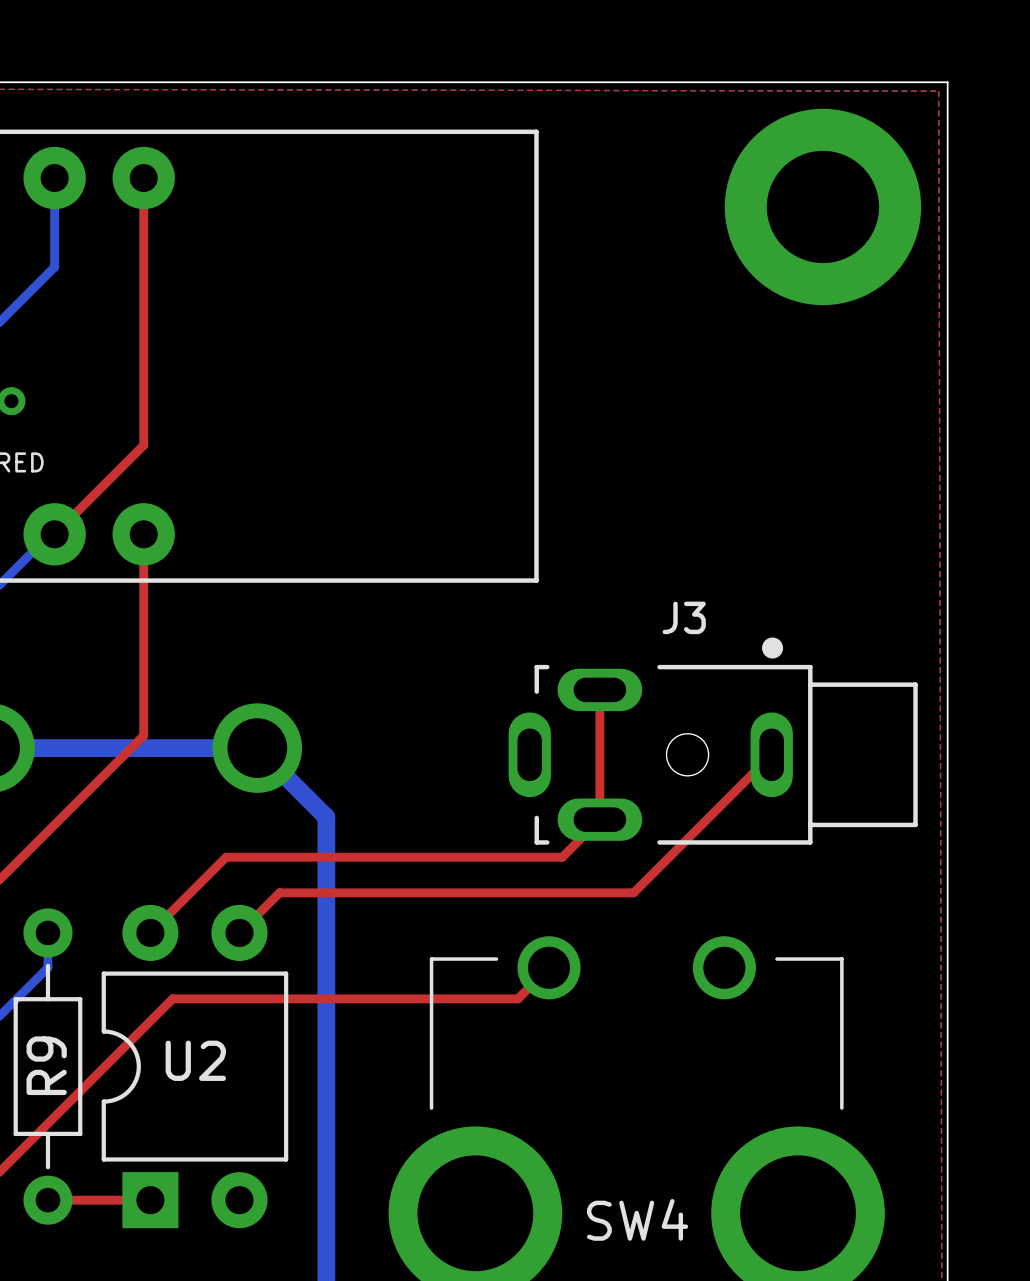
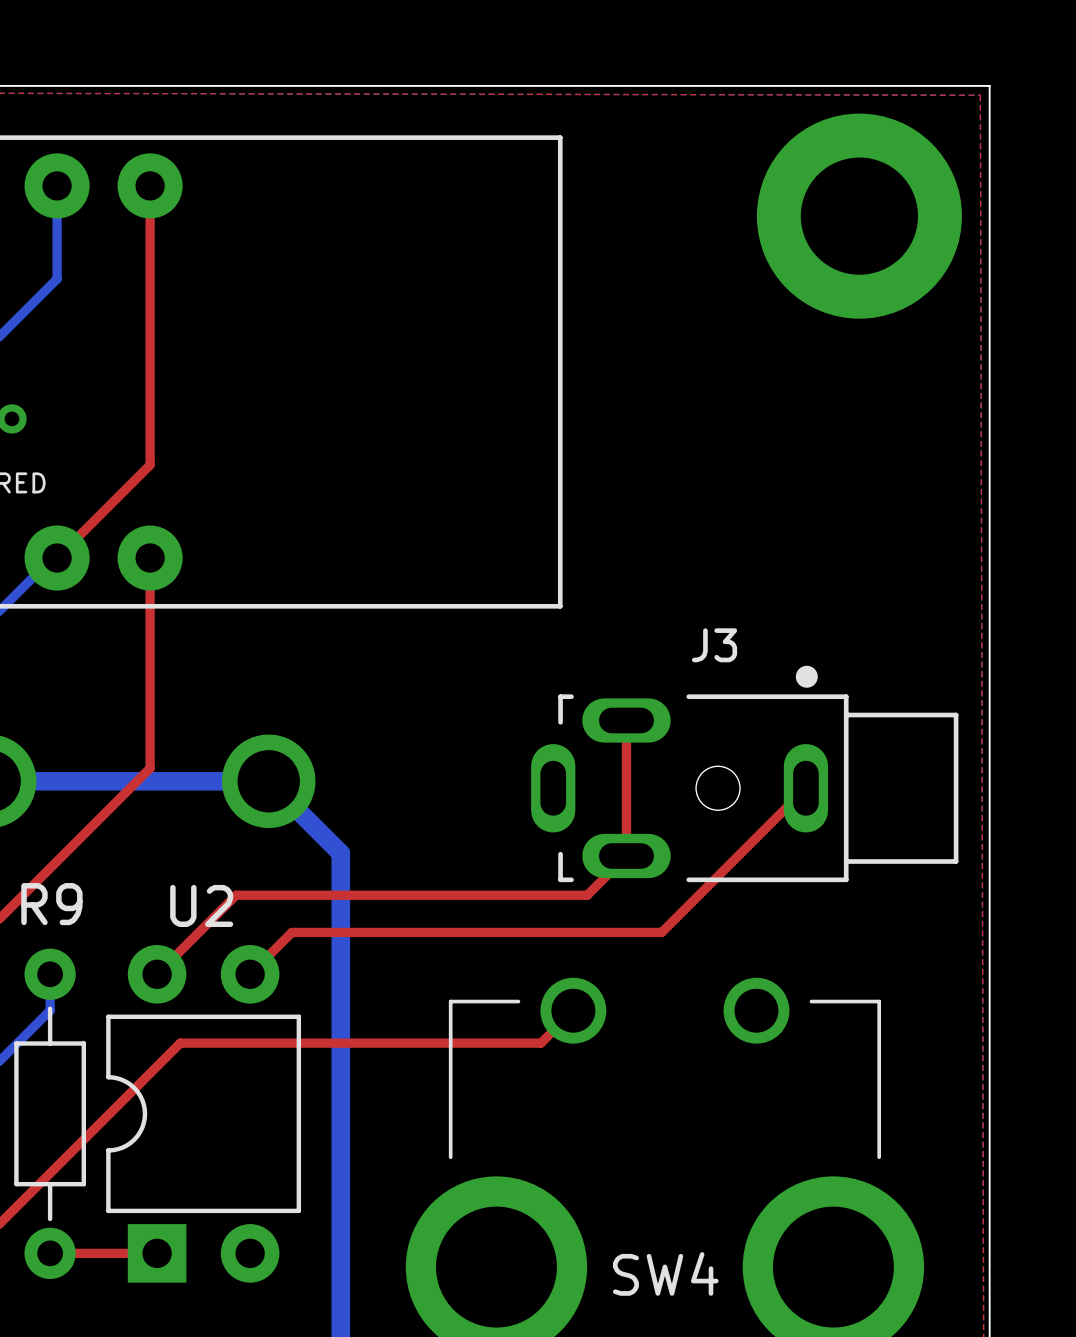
U2 name position: U2 (195, 1060) -> U2 (201, 905)
R9 name rotation: 0° (46, 1065) -> 90° clockwise (51, 904)
R9 name position: R9 (46, 1065) -> R9 (51, 904)

